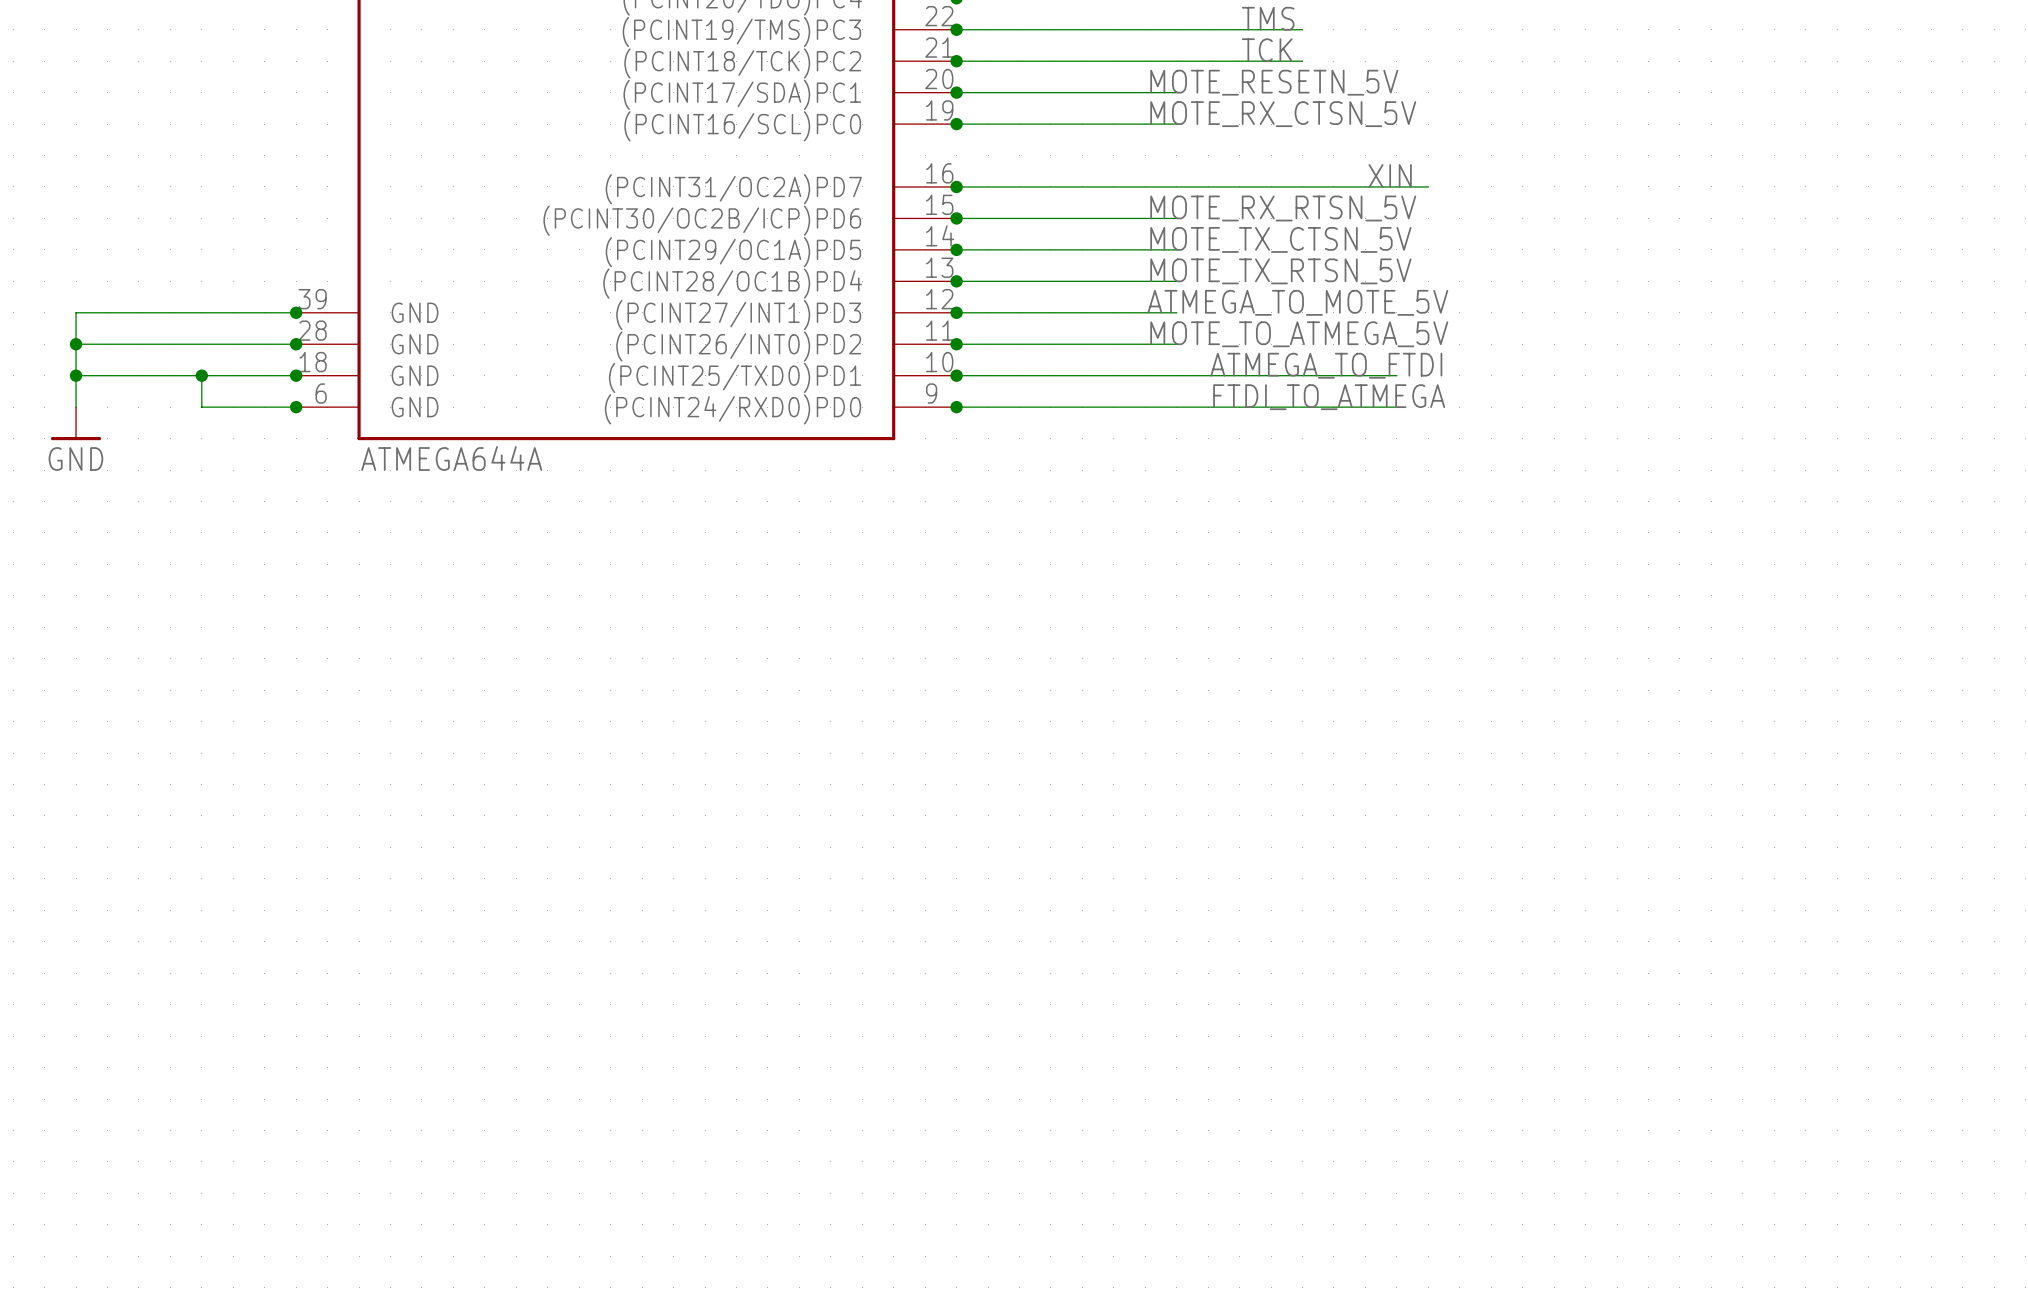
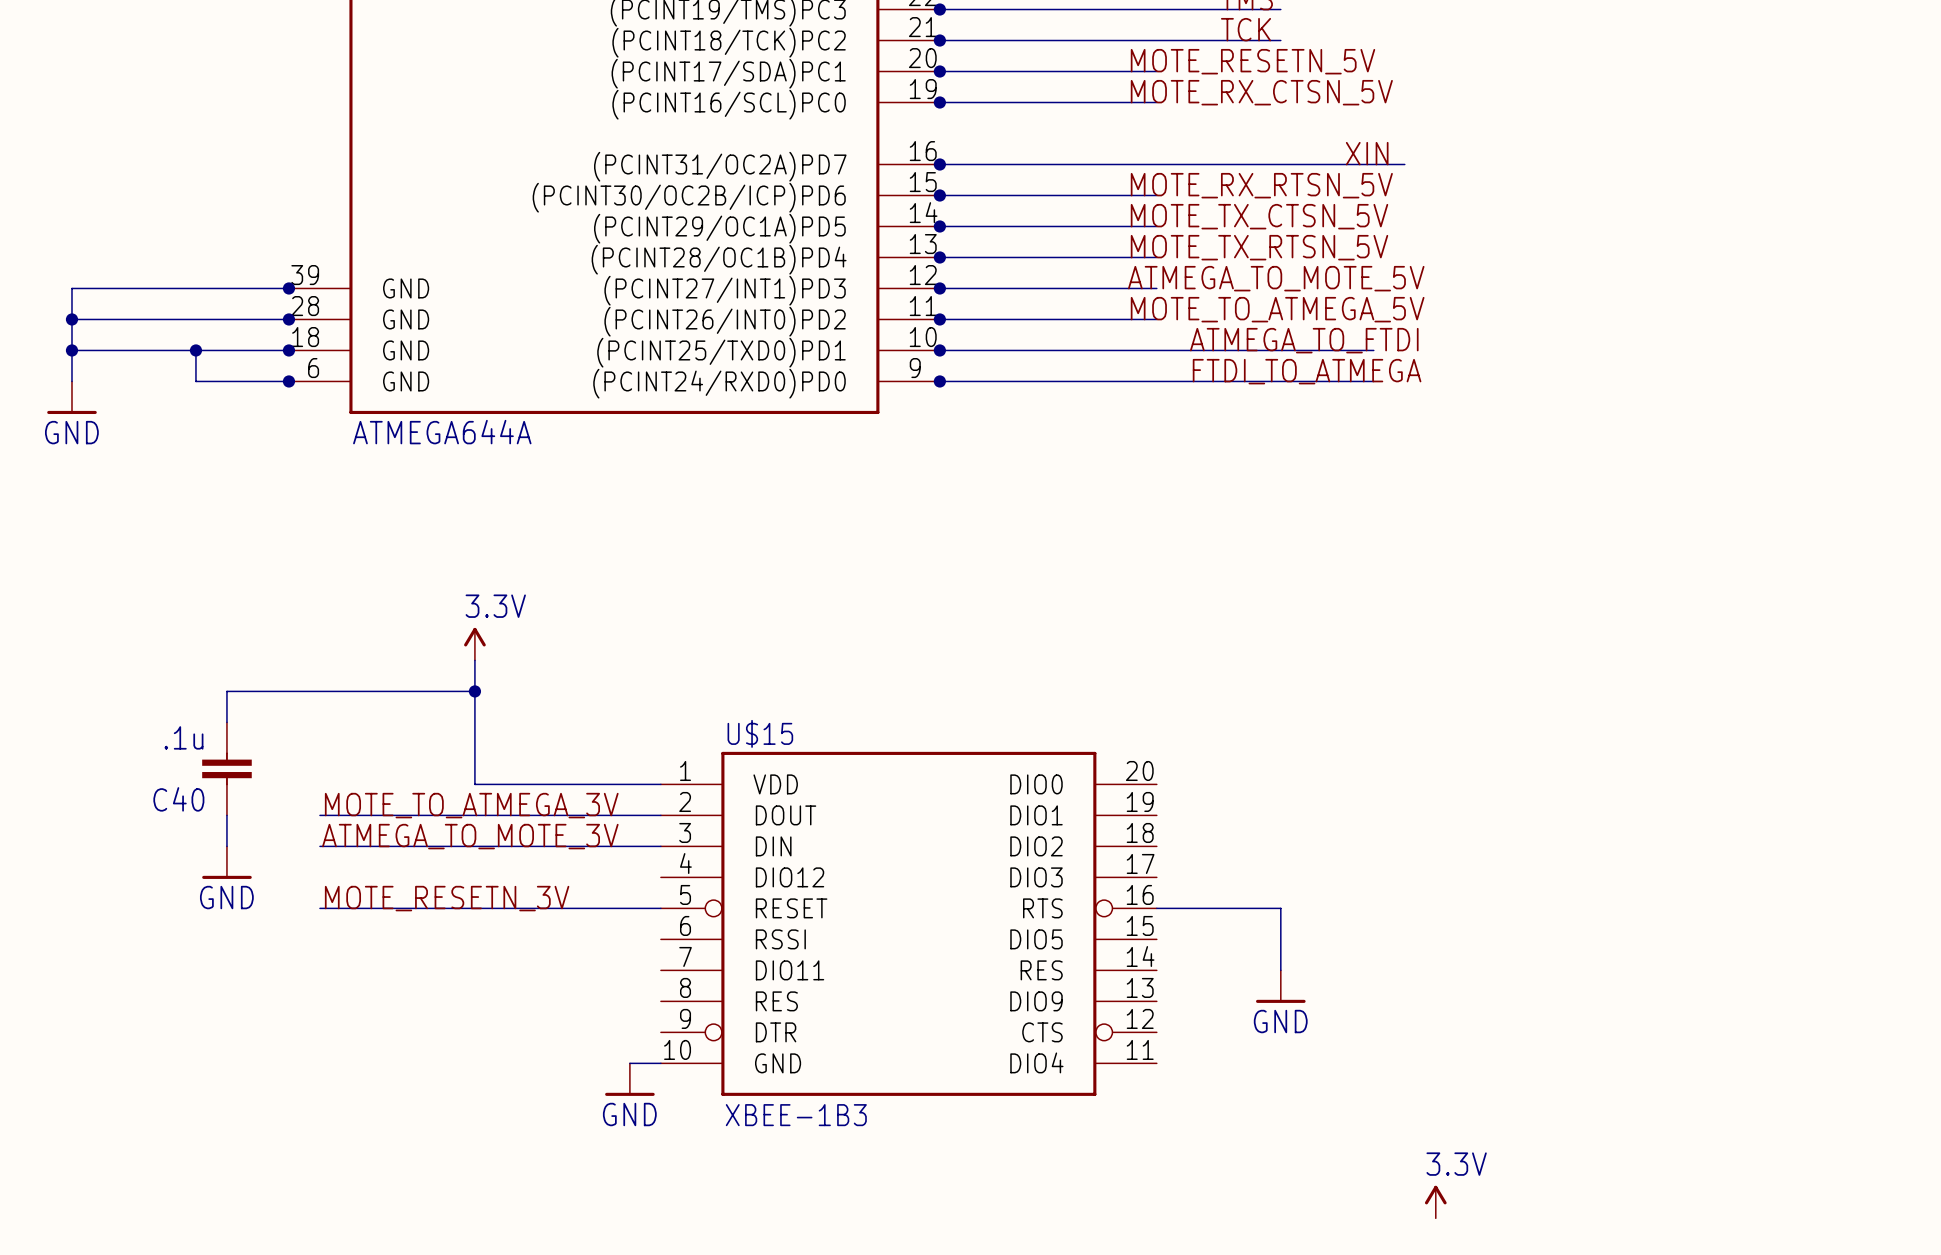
power symbol: none -> 3.3V (474, 644)
wire: none -> (474, 660) (474, 784) (660, 784)
wire: none -> (474, 691) (226, 691) (226, 722)
junction: none -> (474, 691)
C40: none -> .1u (226, 768)
label: none -> MOTE_TO_ATMEGA_3V (471, 805)
wire: none -> (226, 815) (226, 846)
wire: none -> (319, 815) (660, 815)
label: none -> ATMEGA_TO_MOTE_3V (470, 836)
wire: none -> (319, 846) (660, 846)
power symbol: none -> GND (226, 862)
label: none -> MOTE_RESETN_3V (447, 898)
wire: none -> (319, 908) (660, 908)
wire: none -> (1156, 908) (1280, 908) (1280, 970)
U$15: none -> XBEE-1B3 (908, 923)
power symbol: none -> GND (1280, 986)
wire: none -> (629, 1063) (660, 1063)
power symbol: none -> GND (629, 1079)
power symbol: none -> 3.3V (1435, 1202)

